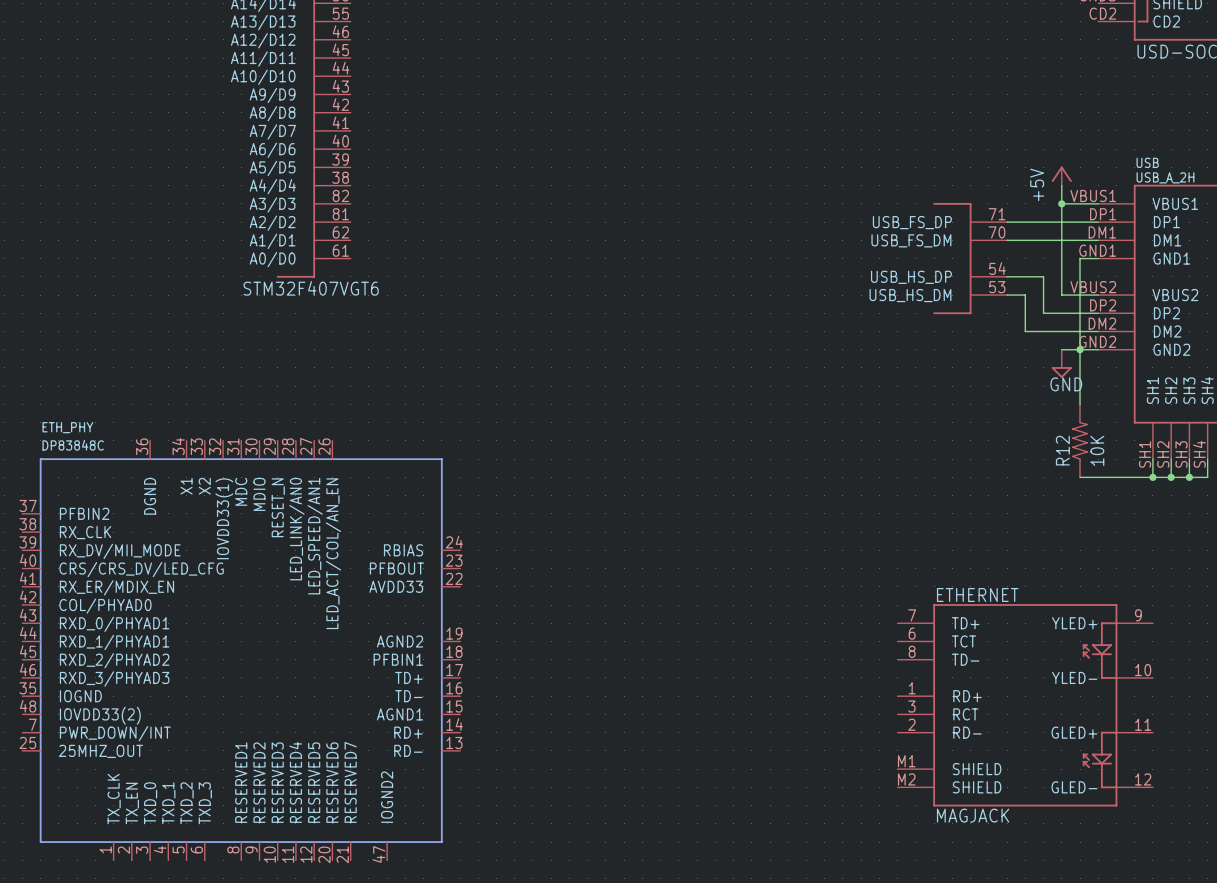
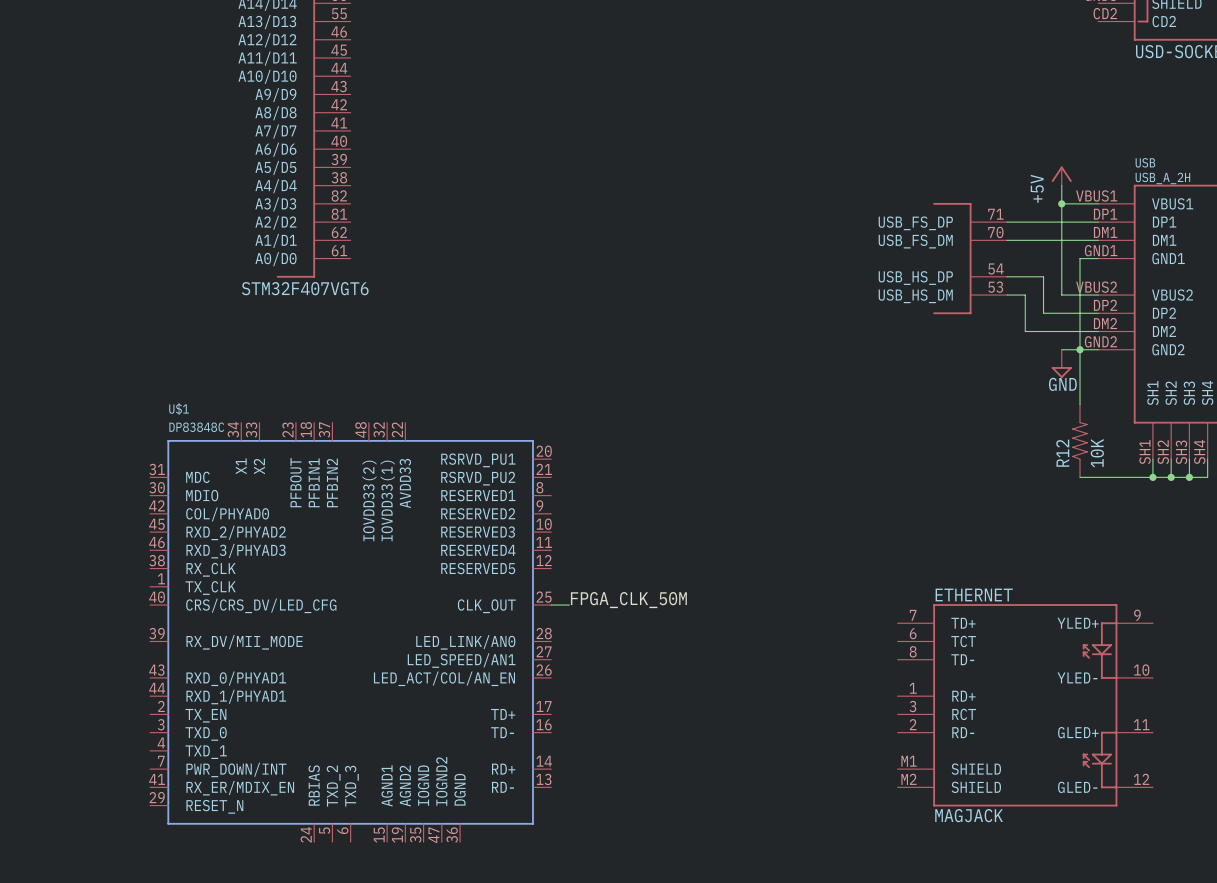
label: none -> FPGA_CLK_50M (628, 600)
wire: none -> (551, 605) (569, 605)
U$1: none -> DP83848C (350, 632)
ETH_PHY: DP83848C (241, 650) -> none

